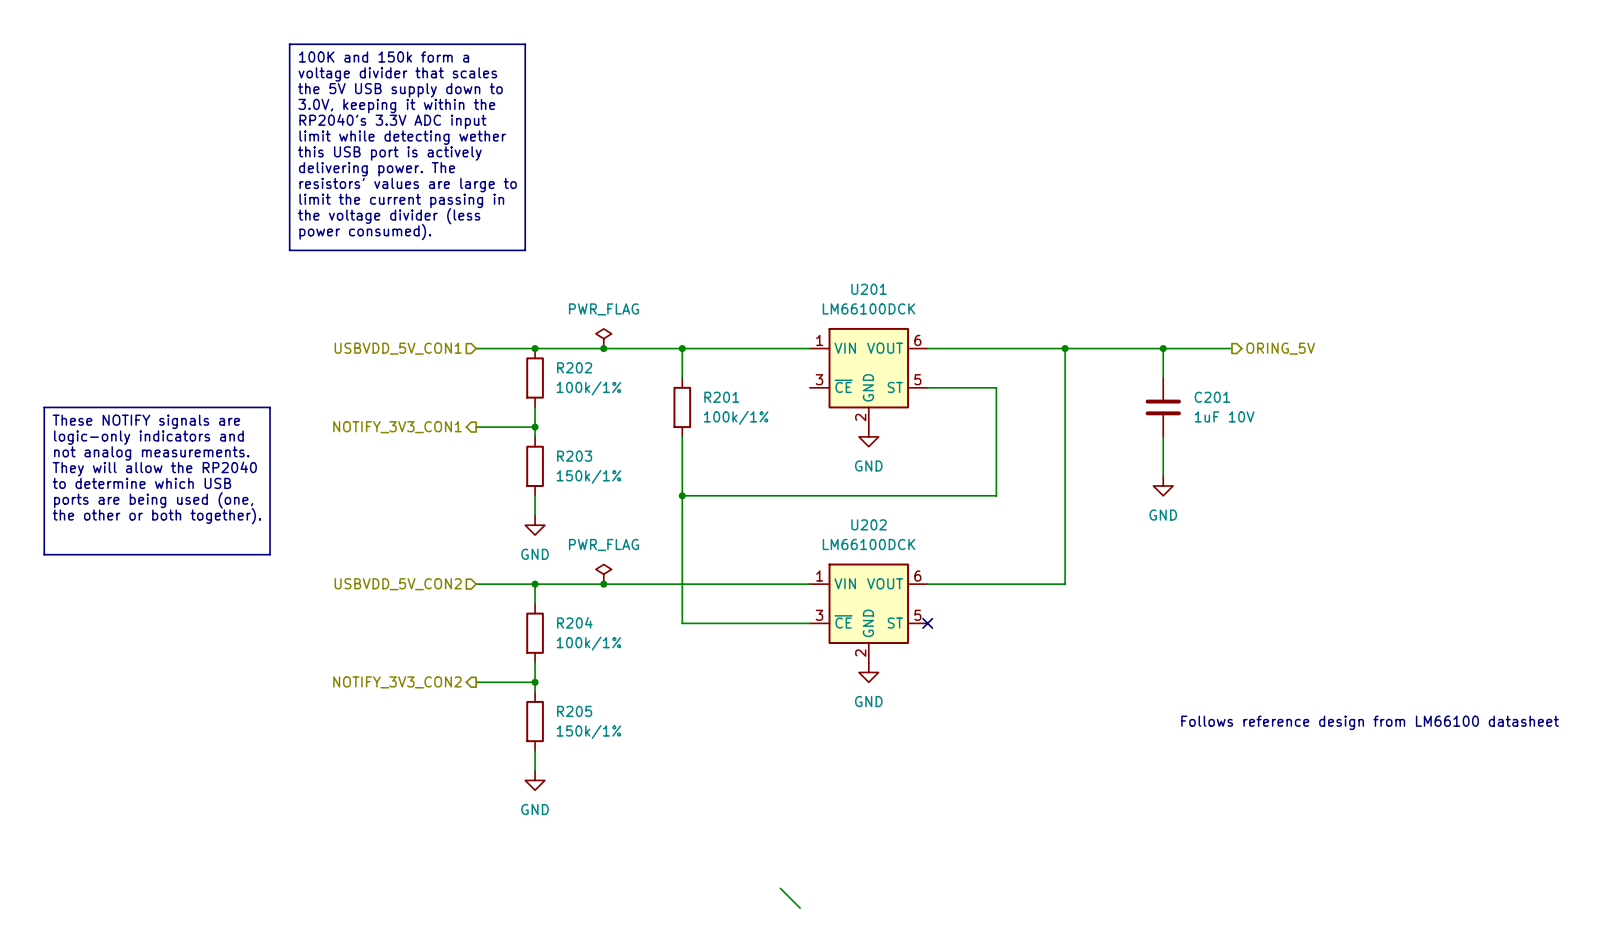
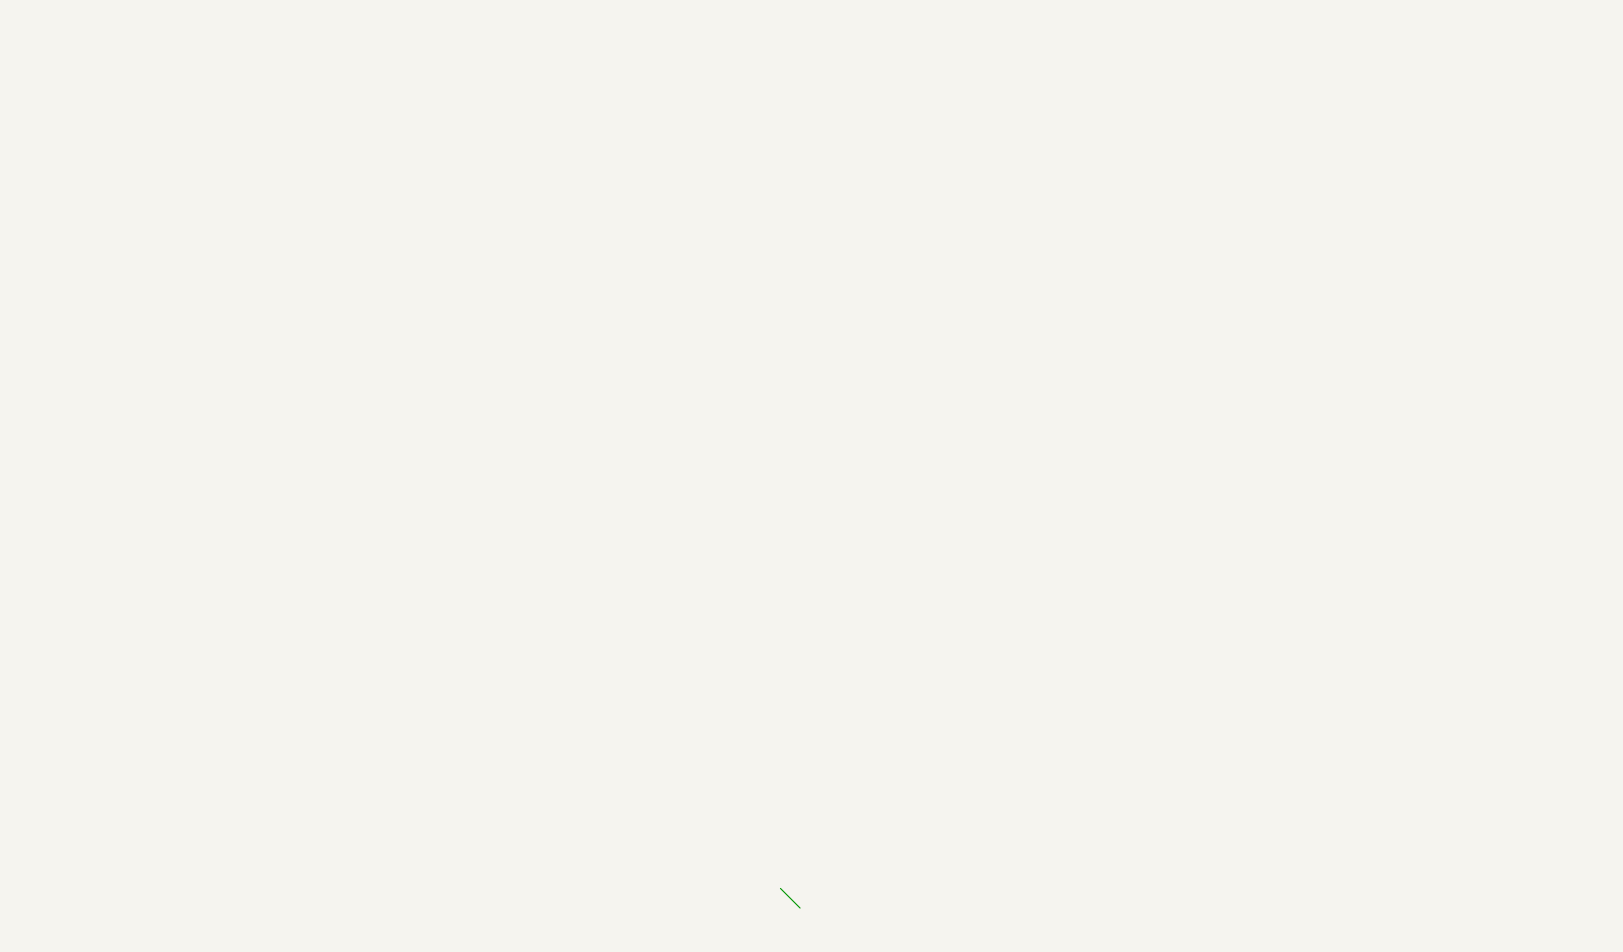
line: (289, 44) (525, 44) (525, 250) (289, 250) (289, 44) -> none
text: 100K and 150k form a (384, 57) -> none
text: voltage divider that scales (397, 74) -> none
text: the 5V USB supply down to (400, 90) -> none
text: 3.0V, keeping it within the (396, 106) -> none
text: RP2040's 3.3V ADC input (392, 121) -> none
text: limit while detecting wether (402, 137) -> none
text: this USB port is actively (389, 153) -> none
text: delivering power. The (377, 169) -> none
text: resistors' values are large to (408, 185) -> none
text: limit the current passing in (401, 200) -> none
text: the voltage divider (less (389, 216) -> none
text: power consumed). (365, 232) -> none
power symbol: PWR_FLAG (603, 338) -> none
hierarchical label: USBVDD_5V_CON1 (398, 348) -> none
wire: (476, 348) (809, 348) -> none
junction: (535, 348) -> none
junction: (603, 348) -> none
wire: (682, 348) (682, 378) -> none
junction: (682, 348) -> none
wire: (927, 348) (1231, 348) -> none
wire: (1065, 348) (1065, 584) (927, 584) -> none
junction: (1065, 348) -> none
wire: (1163, 348) (1163, 378) -> none
junction: (1163, 348) -> none
hierarchical label: ORING_5V (1280, 348) -> none
U201: LM66100DCK (868, 377) -> none
R202: 100k/1% (535, 378) -> none
wire: (927, 387) (996, 387) (996, 495) (682, 495) -> none
line: (44, 407) (270, 407) (270, 554) (44, 554) (44, 407) -> none
wire: (535, 407) (535, 436) -> none
R201: 100k/1% (682, 407) -> none
C201: 1uF 10V (1163, 407) -> none
text: These NOTIFY signals are (146, 421) -> none
hierarchical label: NOTIFY_3V3_CON1 (397, 427) -> none
wire: (476, 427) (535, 427) -> none
junction: (535, 427) -> none
wire: (682, 436) (682, 623) (809, 623) -> none
power symbol: GND (868, 436) -> none
wire: (1163, 436) (1163, 476) -> none
text: logic-only indicators and (148, 437) -> none
text: not analog measurements. (151, 453) -> none
R203: 150k/1% (535, 466) -> none
text: They will allow the RP2040 (154, 469) -> none
text: to determine which USB (141, 483) -> none
power symbol: GND (1163, 485) -> none
wire: (535, 495) (535, 515) -> none
junction: (682, 495) -> none
text: ports are being used (one, (153, 500) -> none
text: the other or both together). (156, 516) -> none
power symbol: GND (535, 525) -> none
power symbol: PWR_FLAG (603, 574) -> none
hierarchical label: USBVDD_5V_CON2 (398, 584) -> none
wire: (476, 584) (809, 584) -> none
wire: (535, 584) (535, 603) -> none
junction: (535, 584) -> none
junction: (603, 584) -> none
U202: LM66100DCK (868, 613) -> none
no-connect mark: (927, 623) -> none
R204: 100k/1% (535, 633) -> none
wire: (535, 662) (535, 692) -> none
power symbol: GND (868, 672) -> none
hierarchical label: NOTIFY_3V3_CON2 (397, 682) -> none
wire: (476, 682) (535, 682) -> none
junction: (535, 682) -> none
R205: 150k/1% (535, 721) -> none
text: Follows reference design from LM66100 datasheet (1370, 722) -> none
wire: (535, 751) (535, 770) -> none
power symbol: GND (535, 780) -> none

